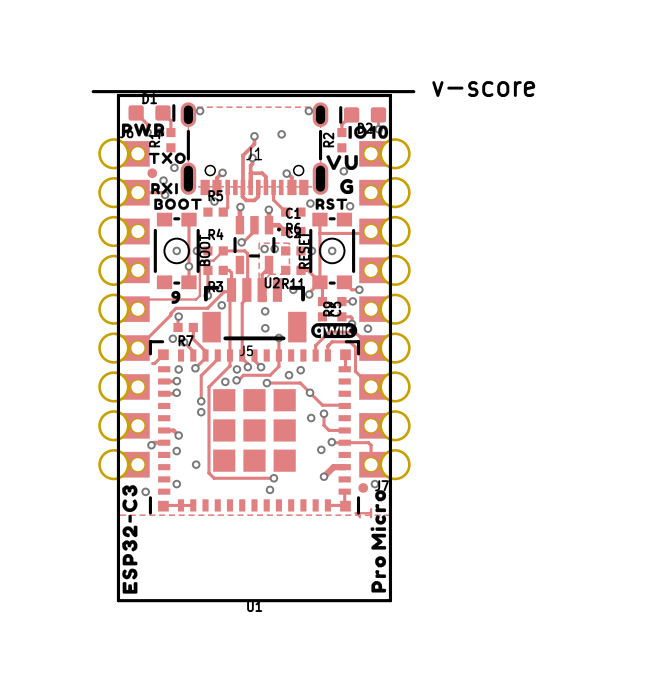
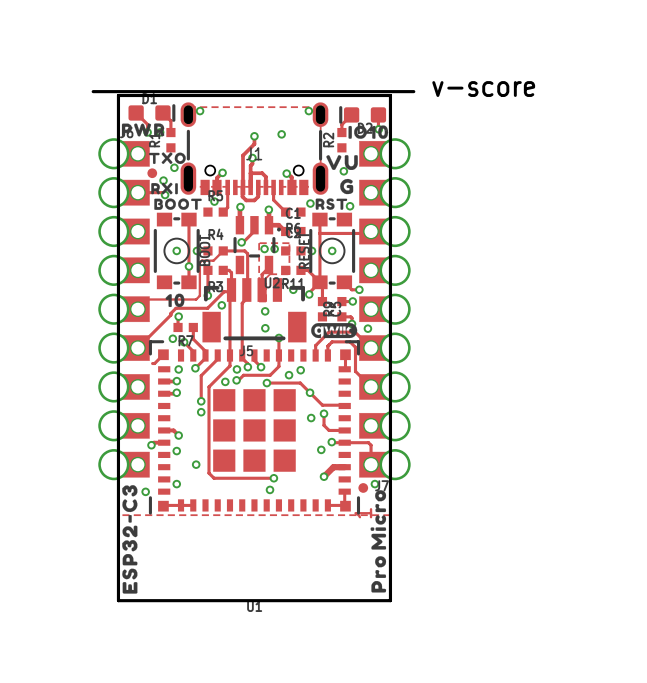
drawing shape: [171, 290, 181, 304] -> [165, 293, 185, 308]

